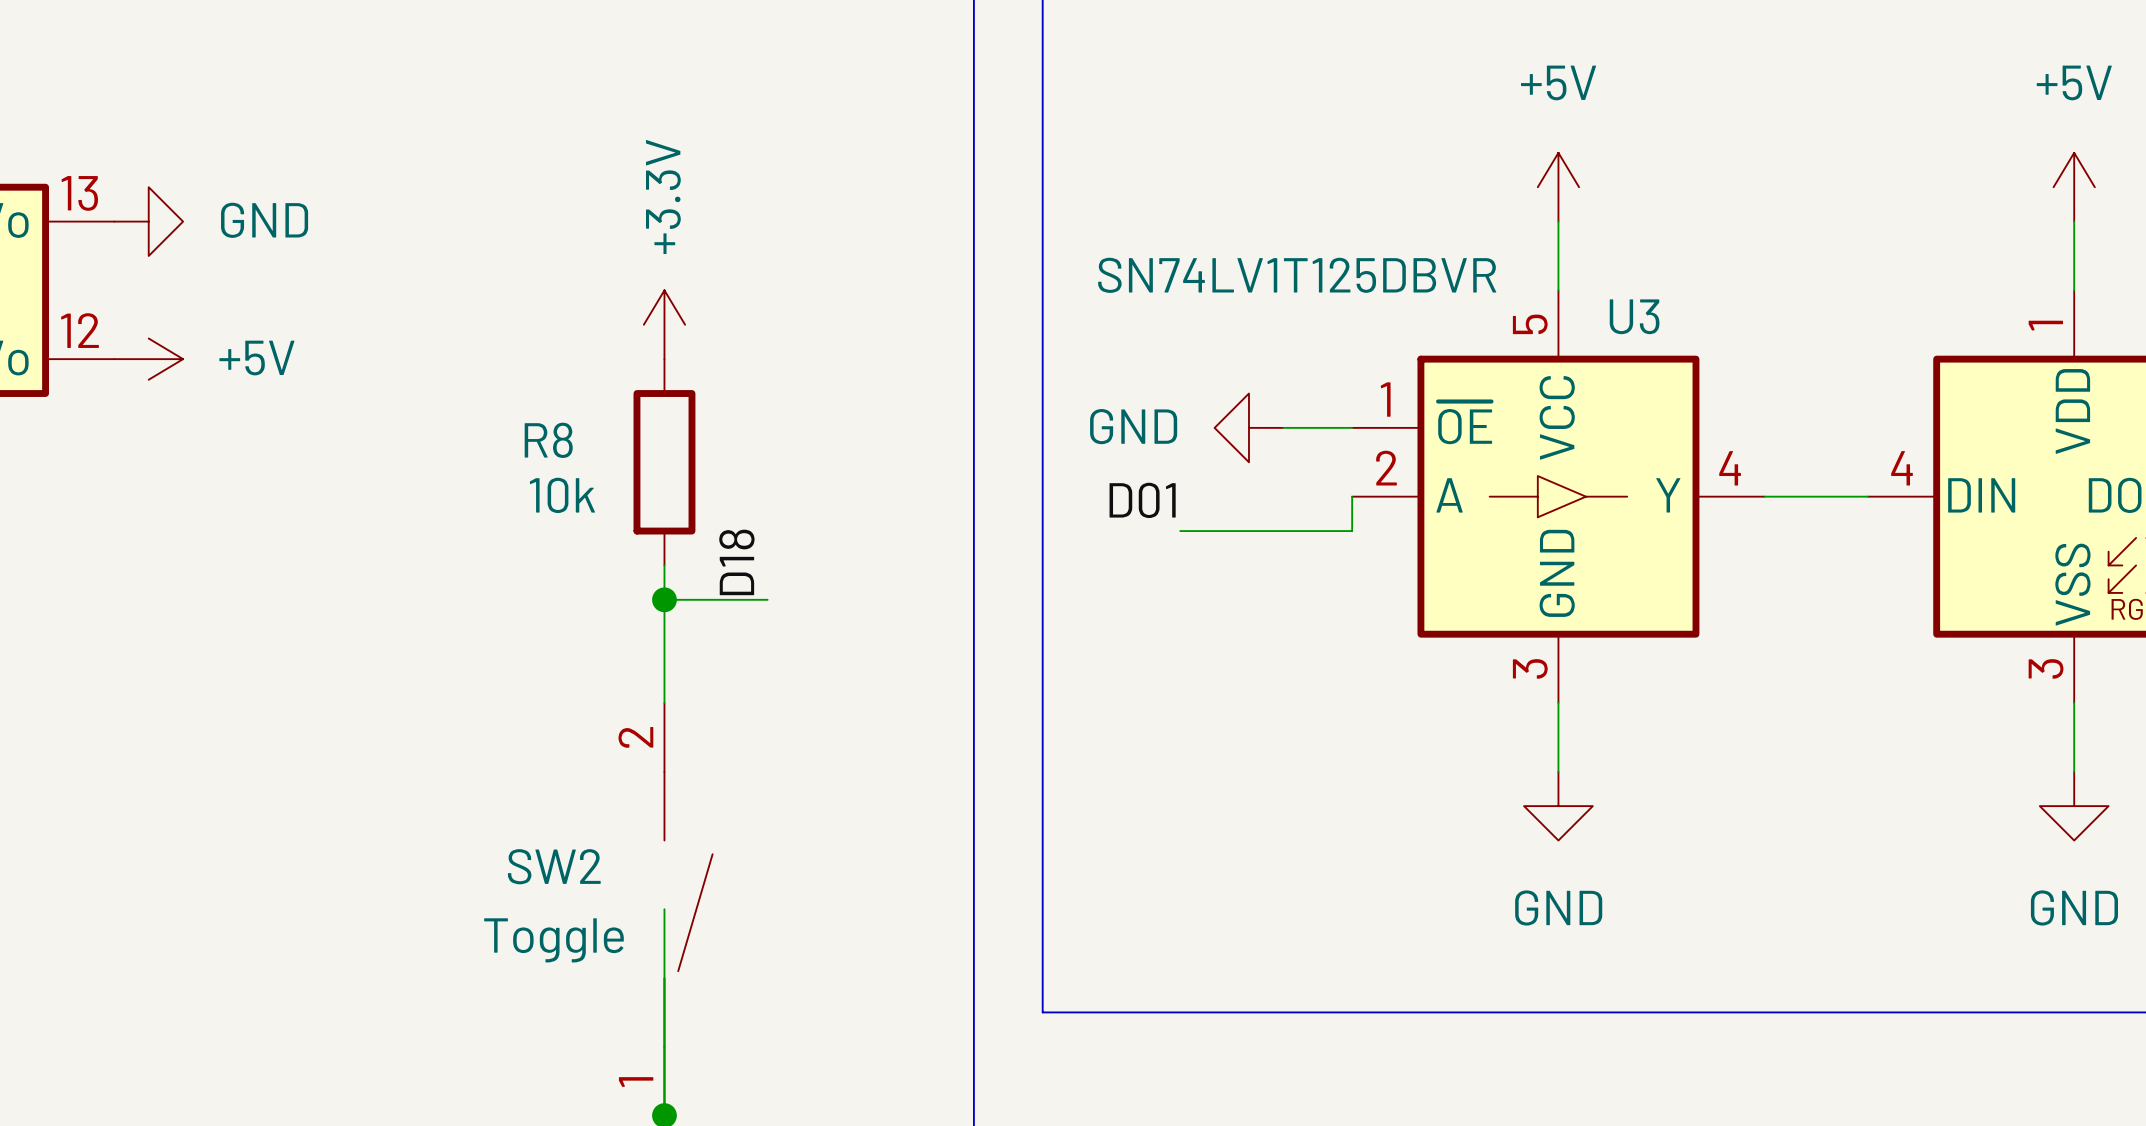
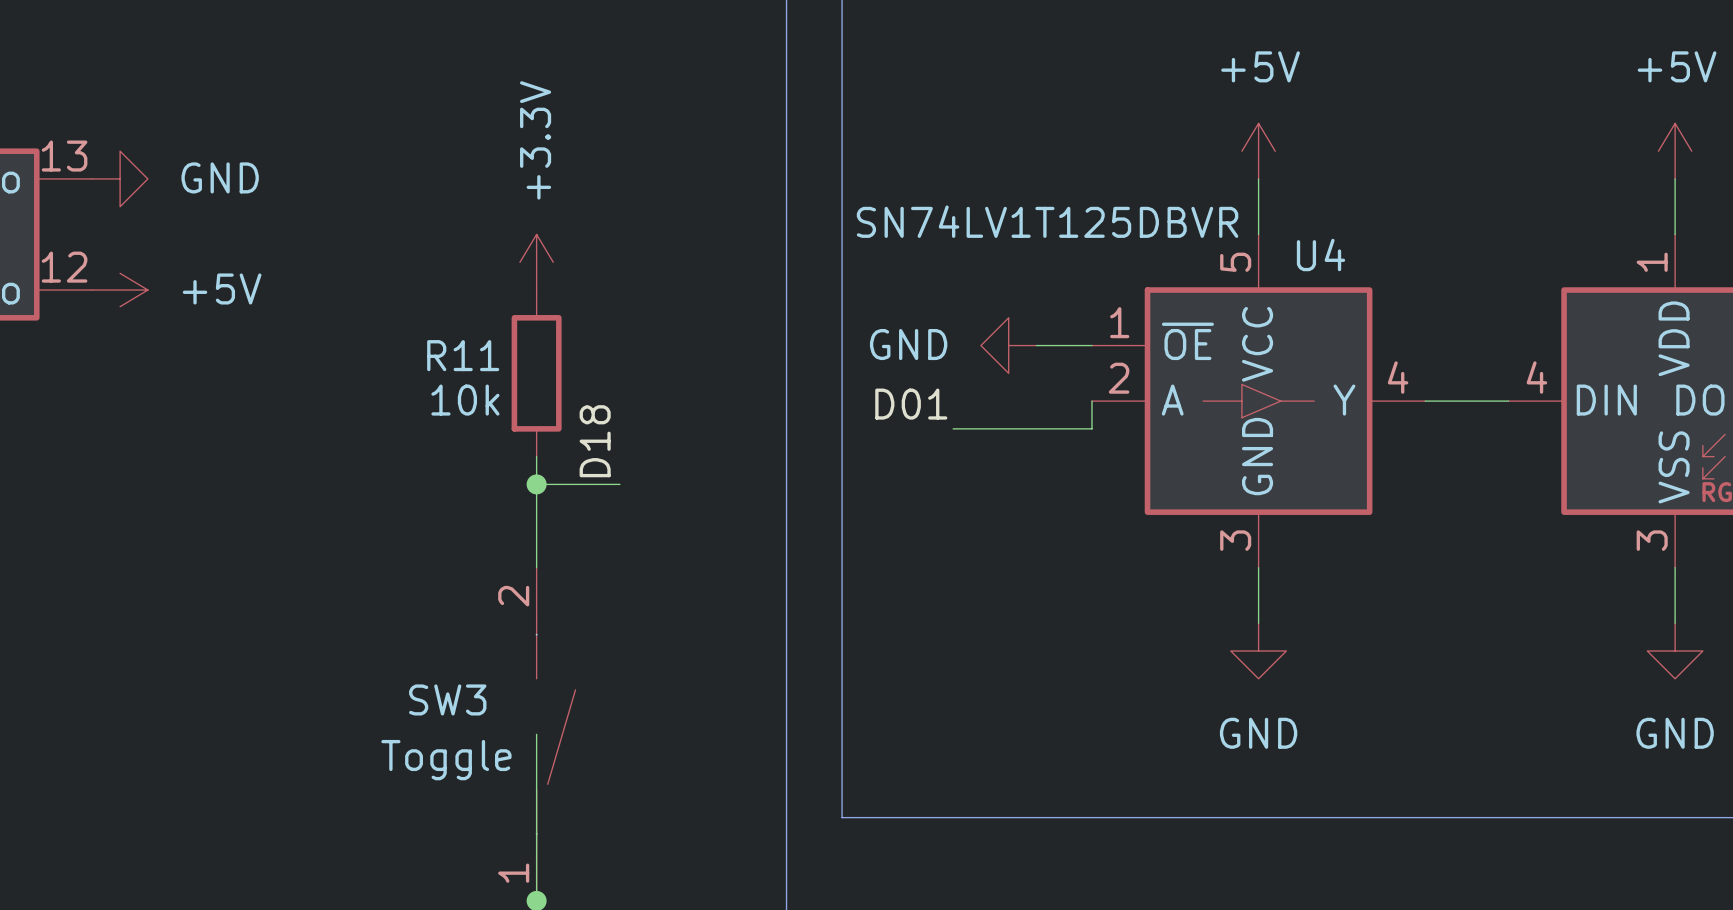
U3 name: U3 (1634, 316) -> U4 (1320, 255)
R8 name: R8 (548, 440) -> R11 (463, 355)
SW2 name: SW2 (554, 866) -> SW3 (447, 699)

